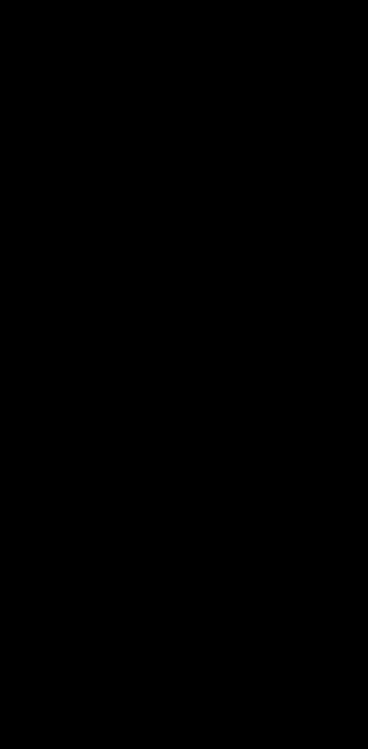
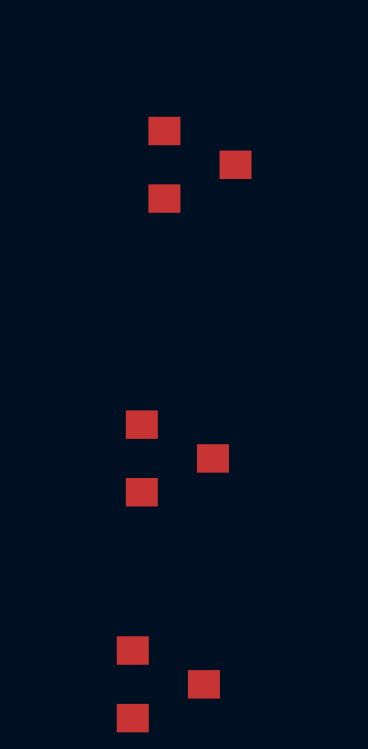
part: none -> (199, 164)
part: none -> (177, 458)
part: none -> (168, 684)

